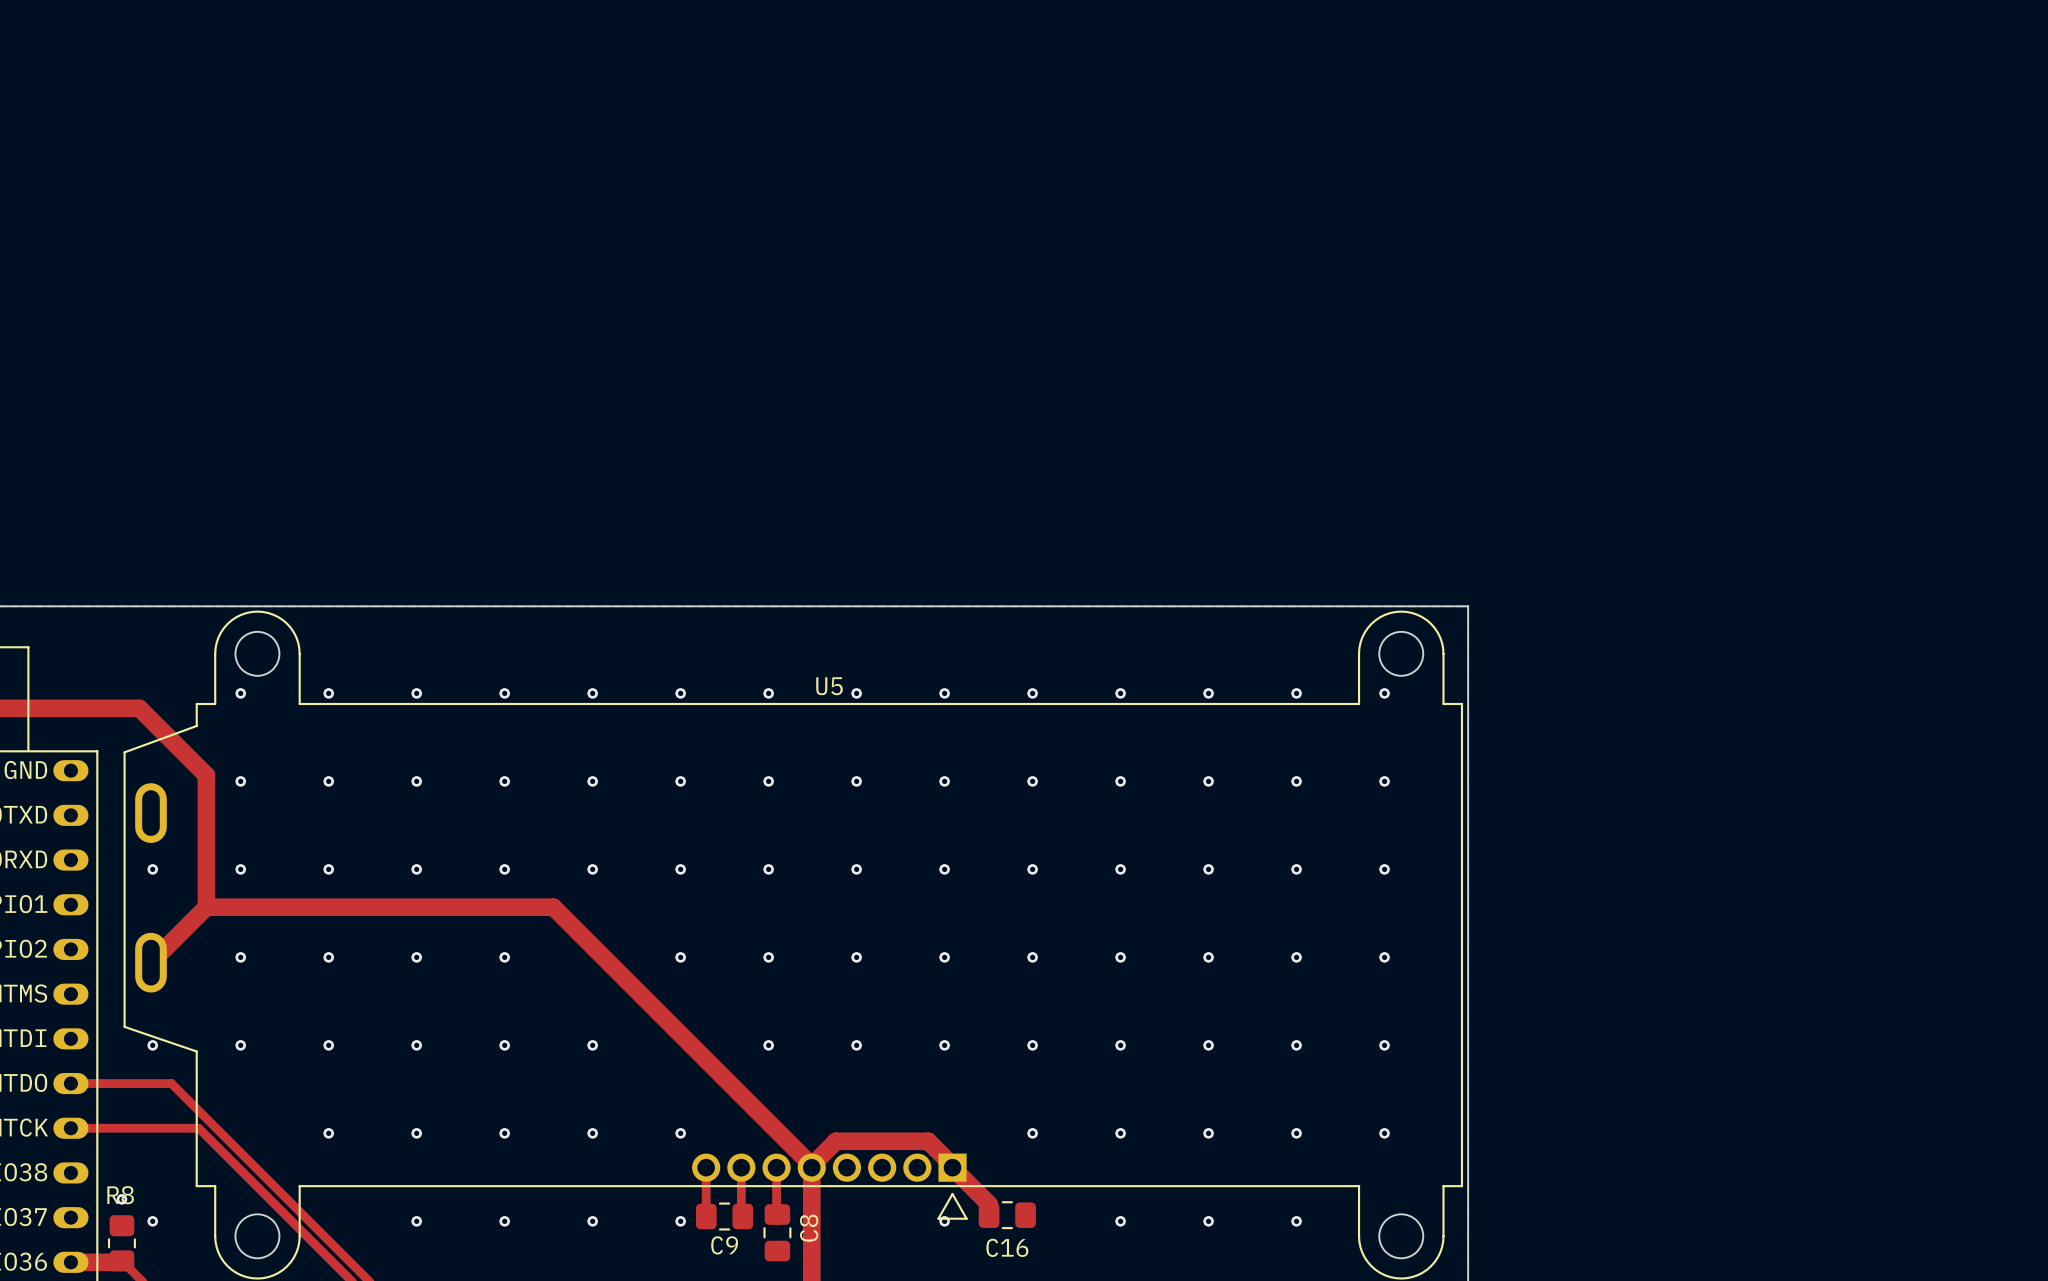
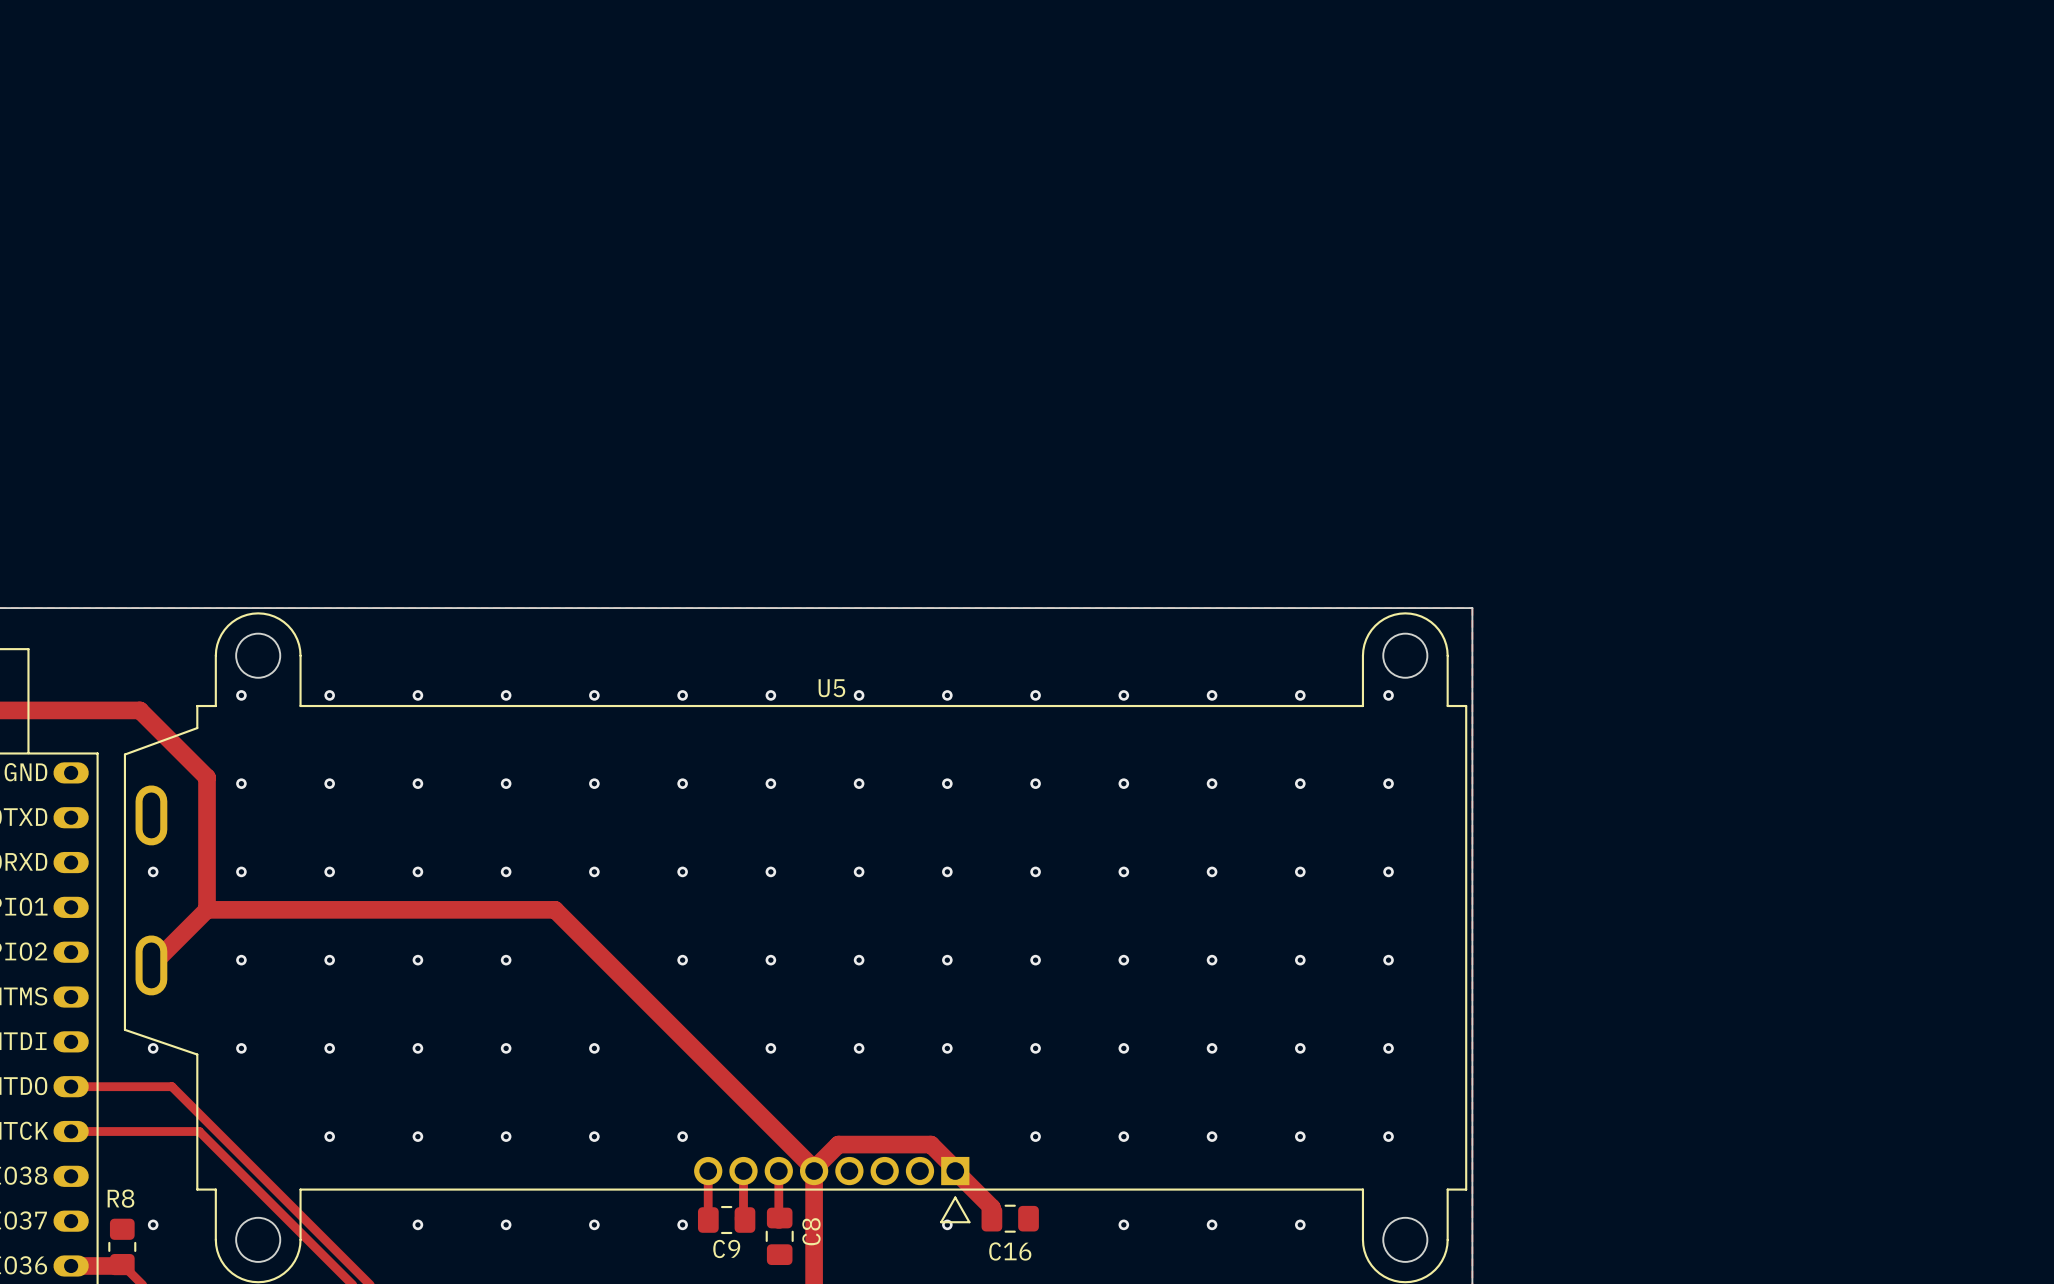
via: (121, 1199) -> none

